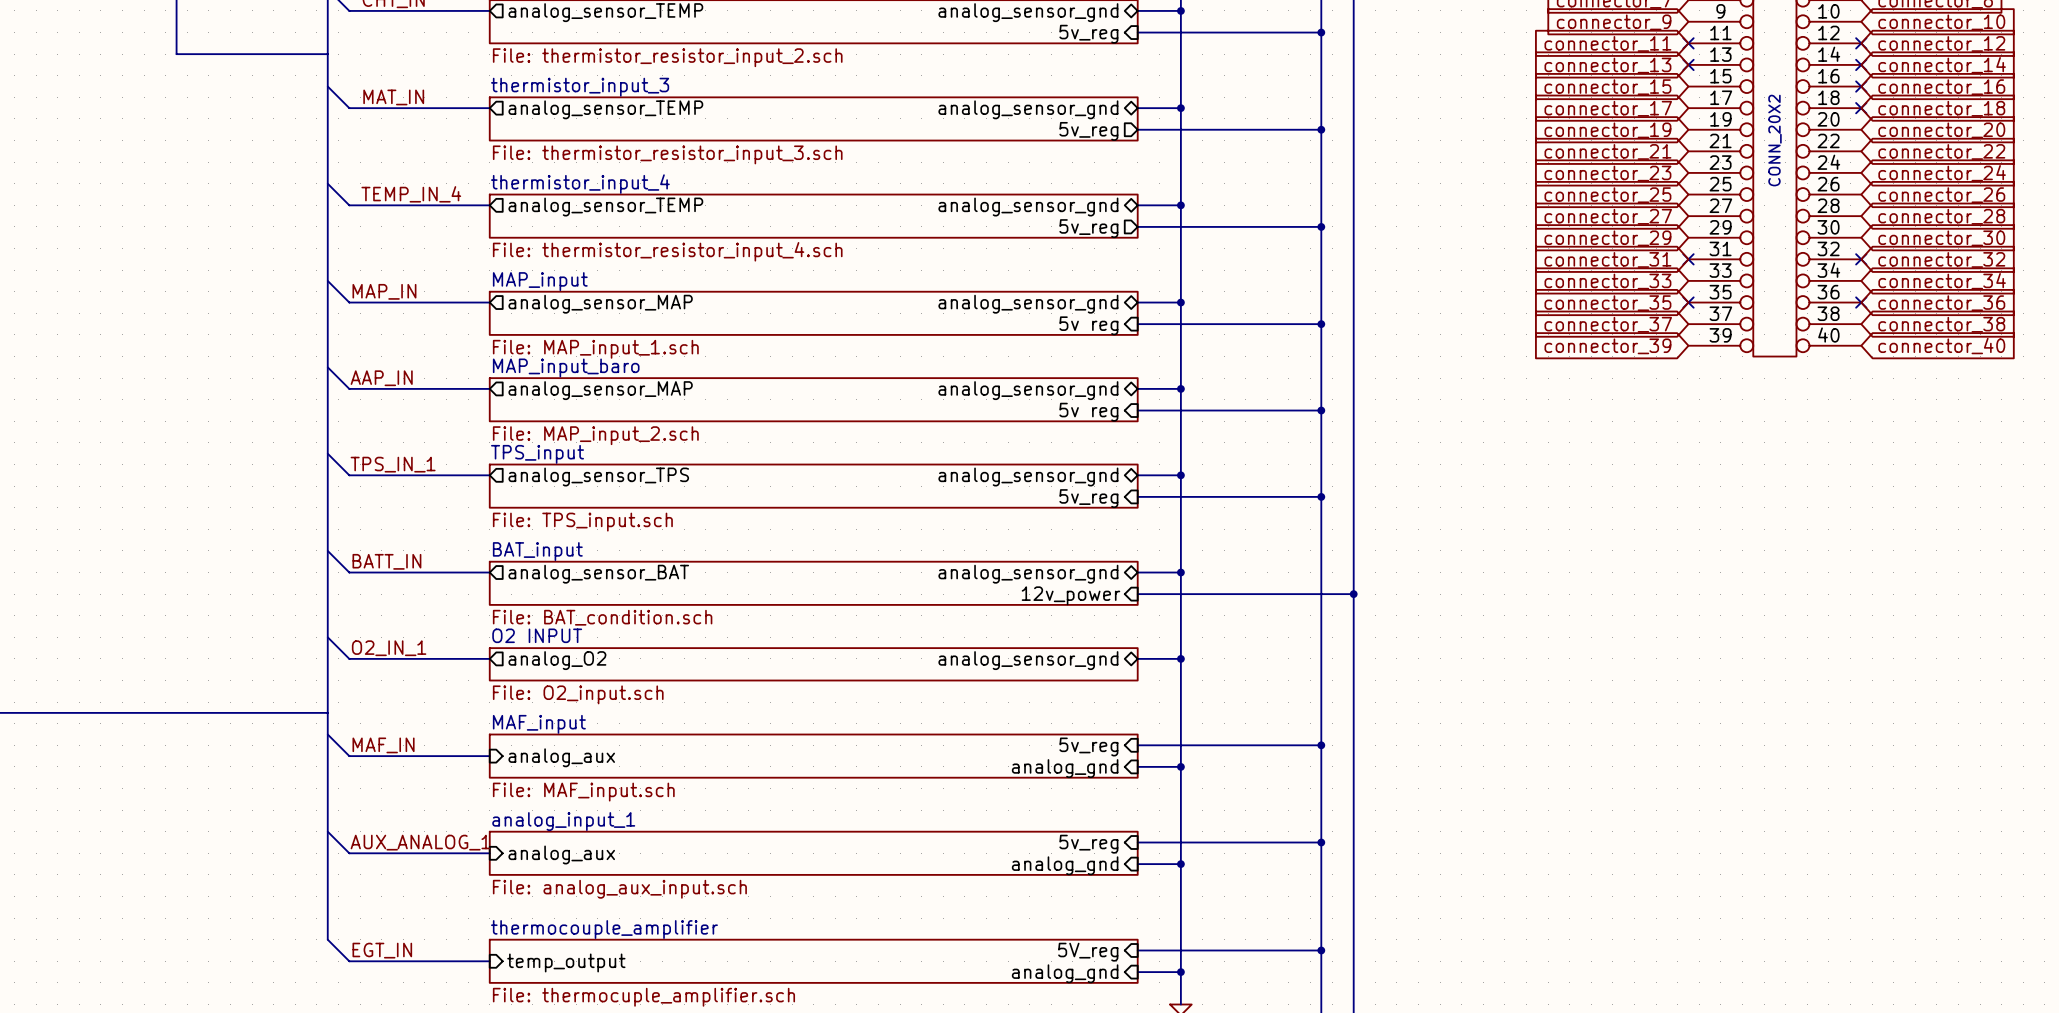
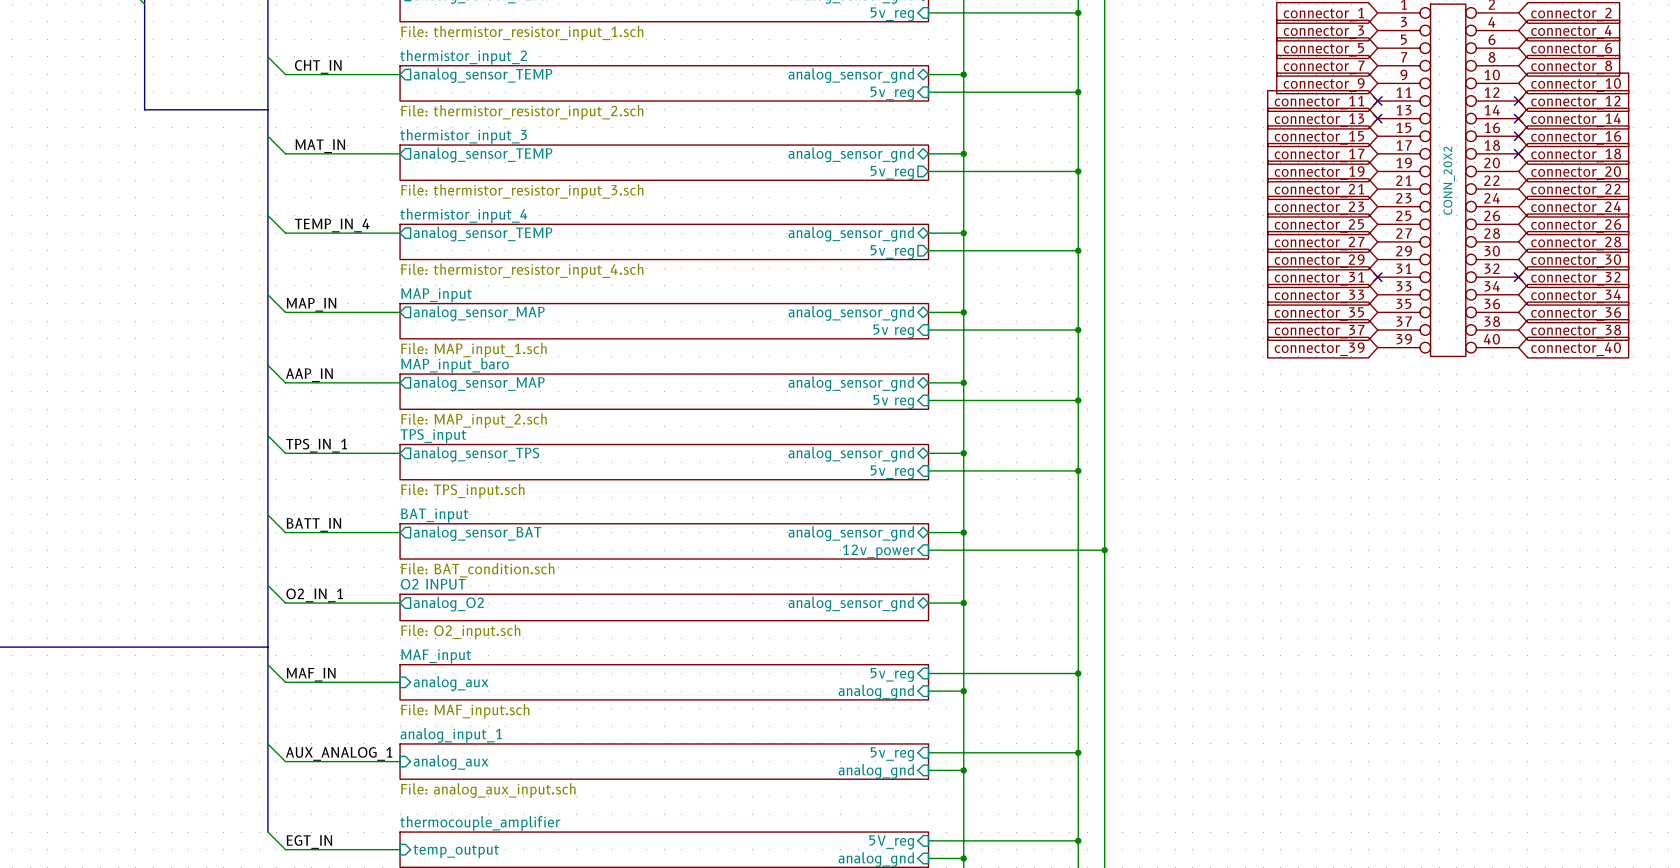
no-connect mark: (1688, 302) -> none
no-connect mark: (1861, 302) -> none

